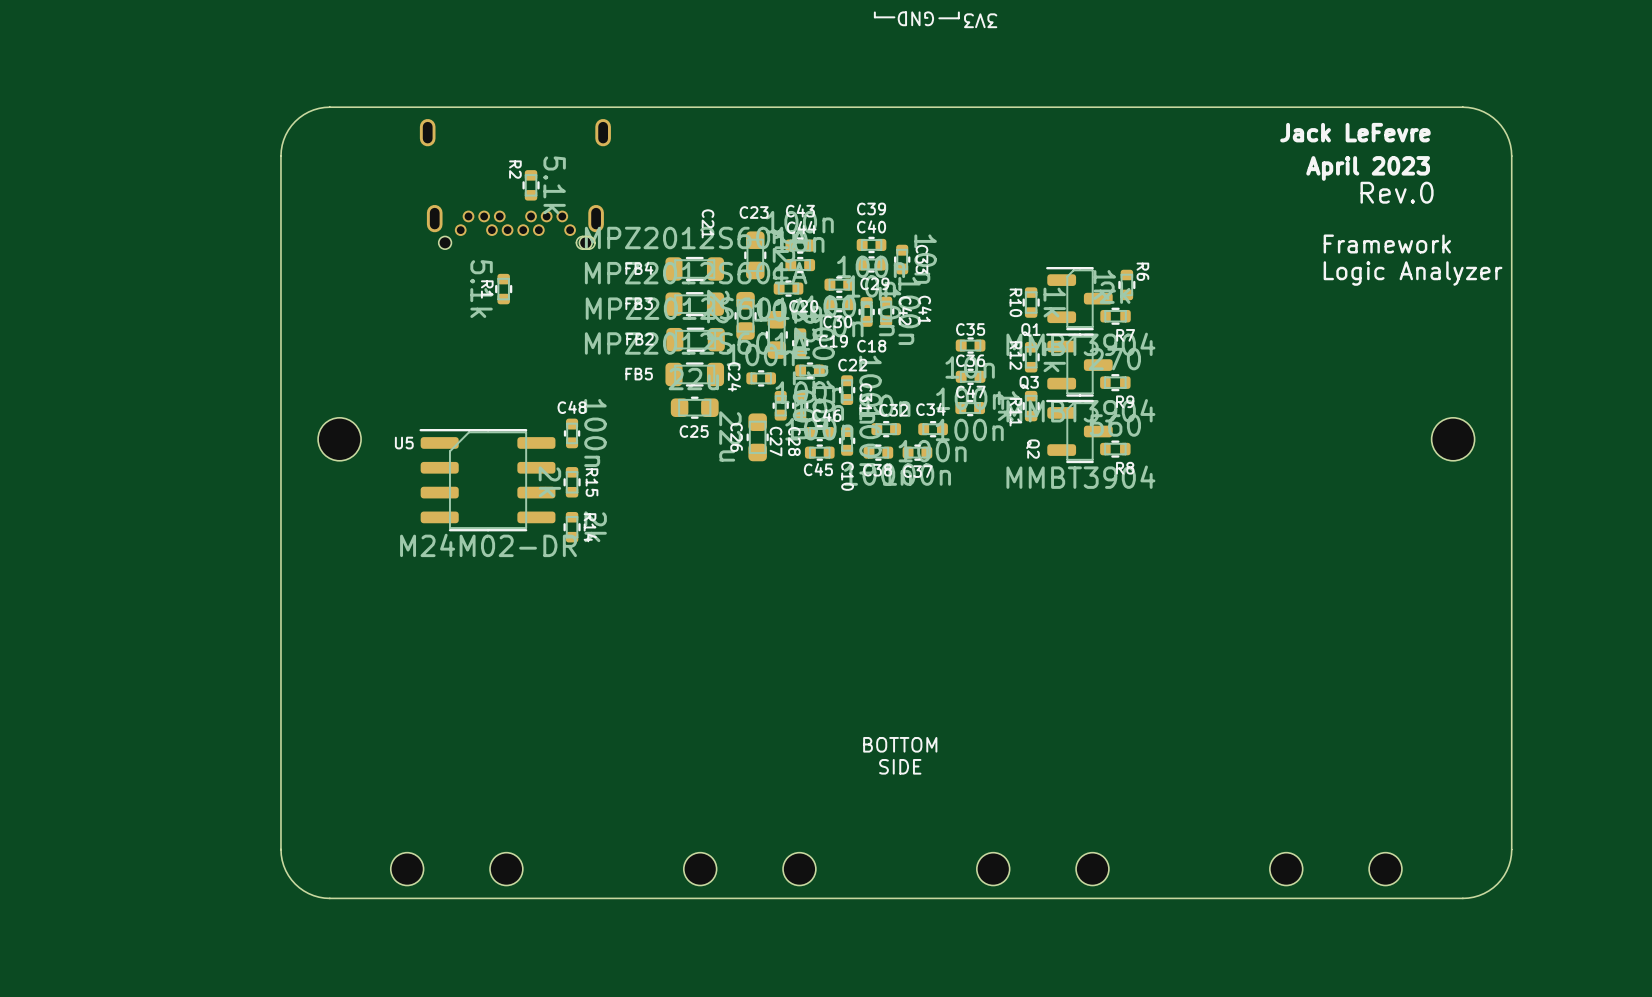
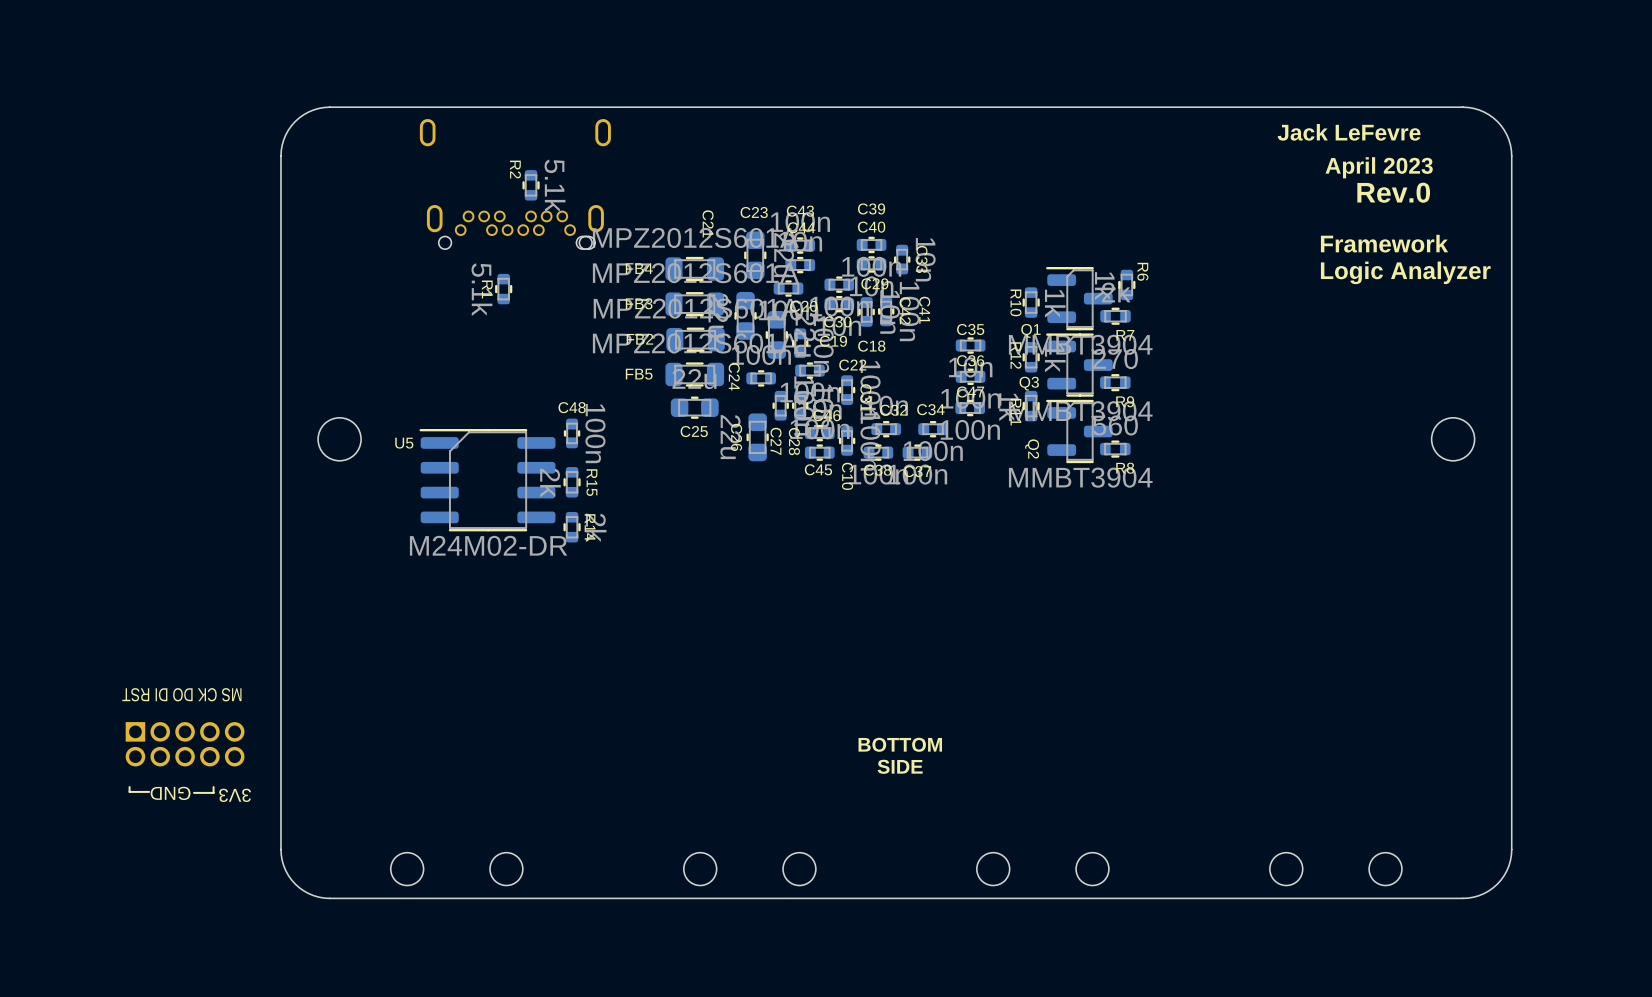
line: (874, 12) (874, 17) (894, 17) -> none
line: (958, 12) (958, 18) (939, 18) -> none
text: GND (915, 18) -> none
text: 3V3 (980, 20) -> none
text: none -> MS CK DO DI RST (181, 694)
part: none -> (185, 744)
line: none -> (129, 787) (129, 791) (149, 791)
line: none -> (213, 787) (213, 792) (194, 792)
text: none -> GND (170, 793)
text: none -> 3V3 (235, 795)

